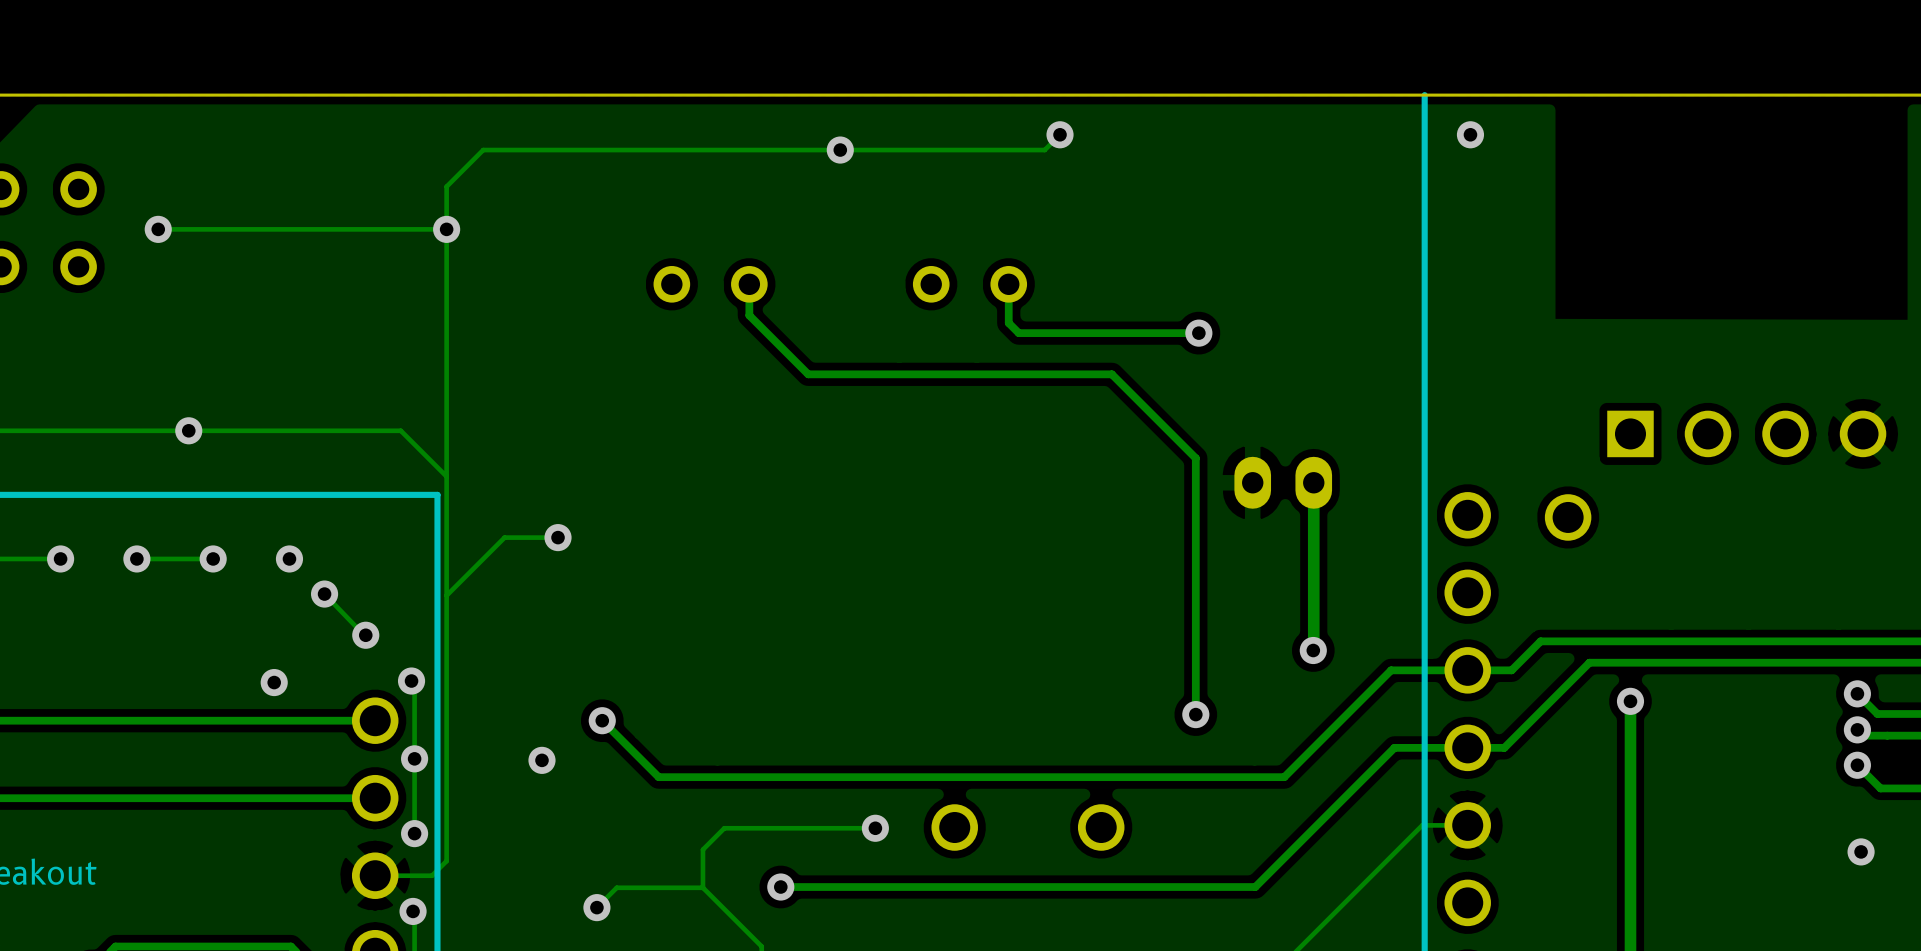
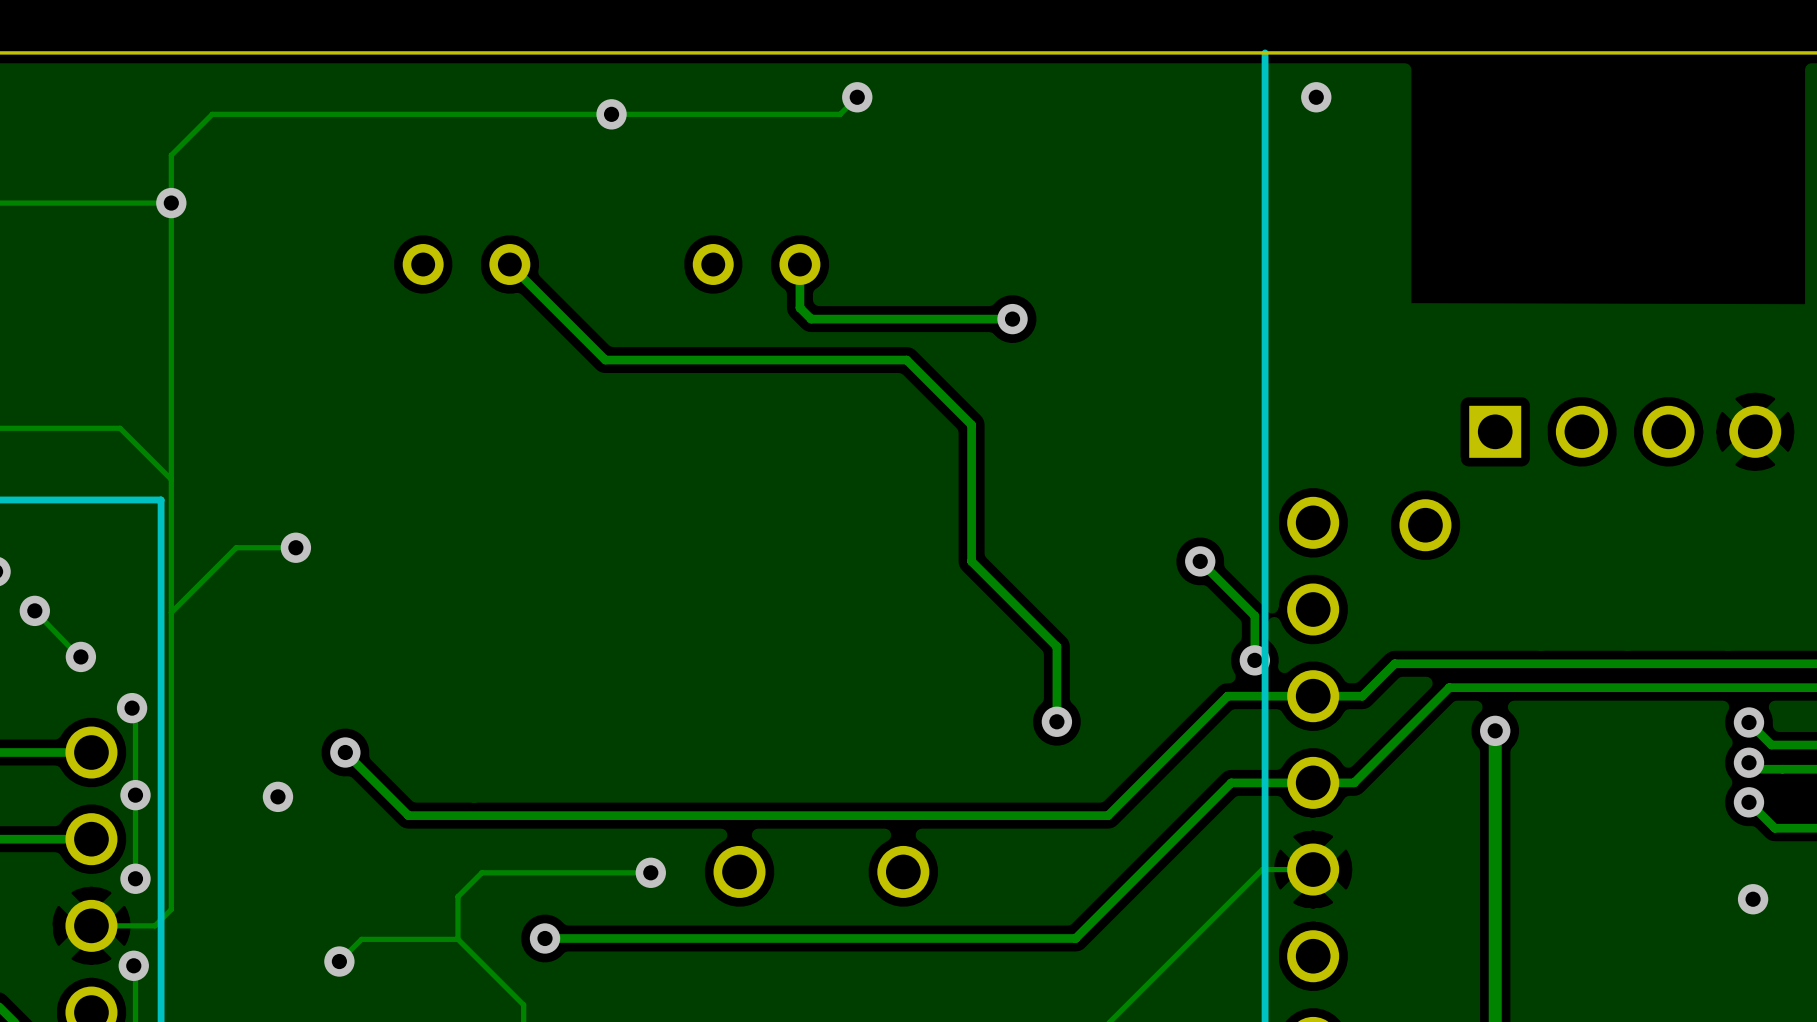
track: (749, 284) (749, 315) (808, 374) (1111, 374) (1195, 458) (1195, 714) -> (509, 264) (605, 360) (906, 360) (971, 424) (971, 561) (1056, 646) (1056, 721)
part: (1283, 482) -> none
track: (1313, 482) (1313, 650) -> none
track: none -> (1200, 561) (1254, 615) (1254, 660)
via: none -> (1200, 561)
via: none -> (1254, 660)
via: (1313, 650) -> none
via: none -> (1056, 721)
via: (1195, 714) -> none

